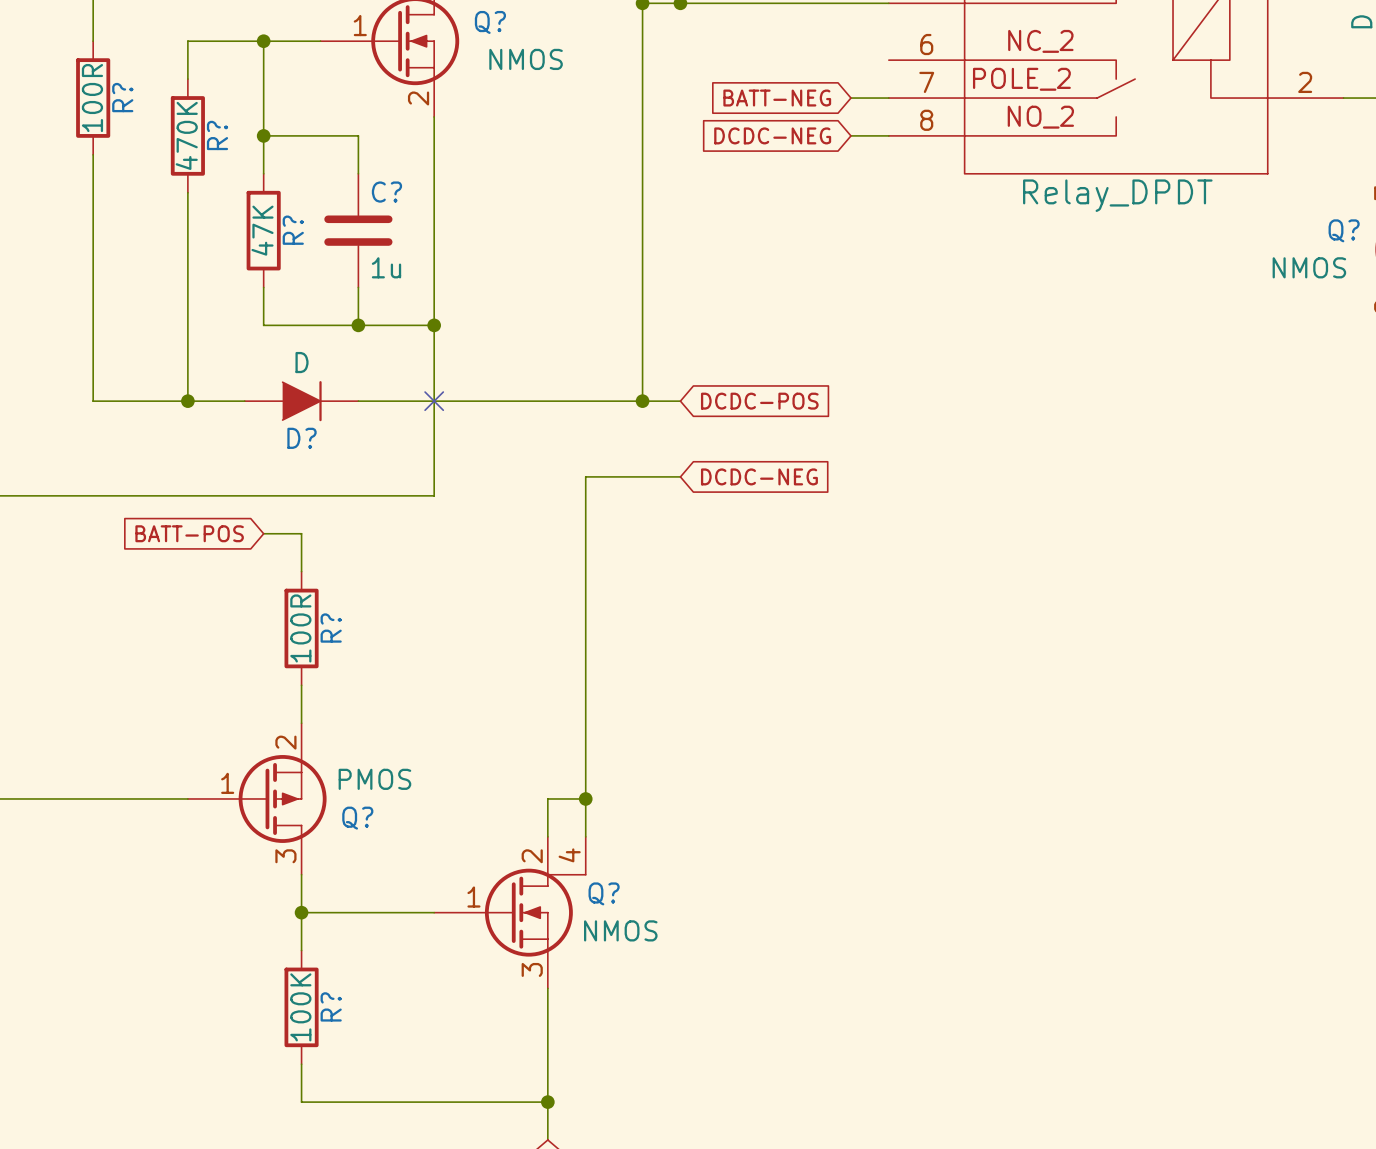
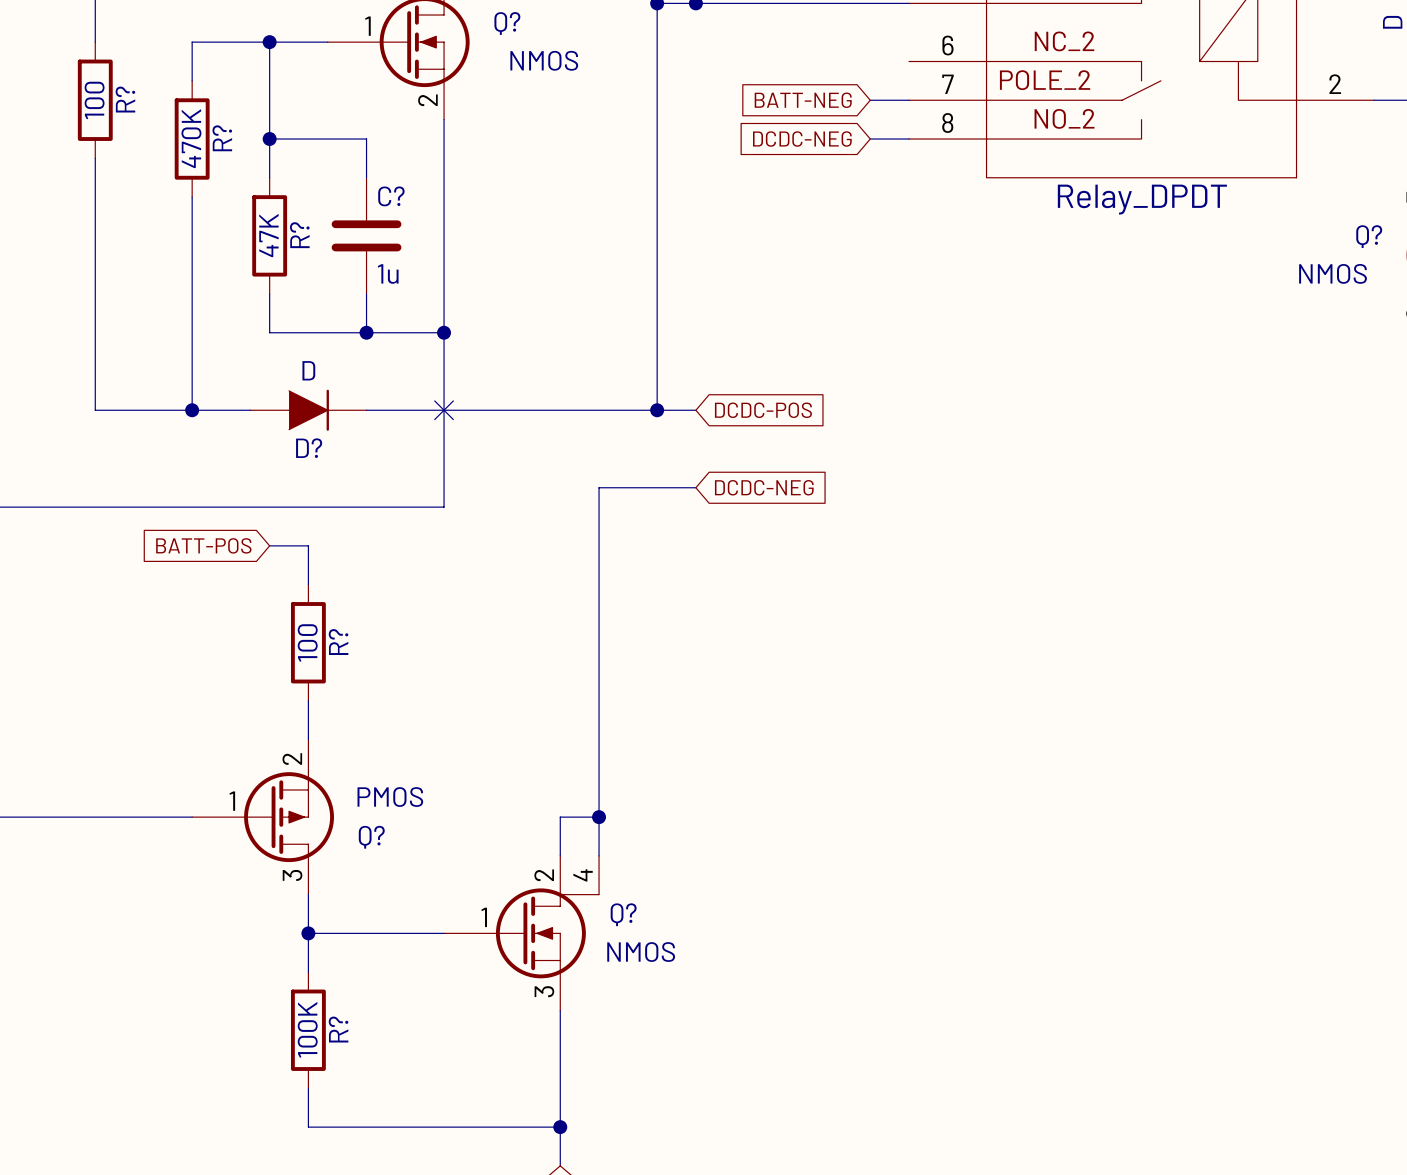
R? value: 100R (92, 98) -> 100 (94, 100)
R? value: 100R (300, 628) -> 100 (307, 642)

